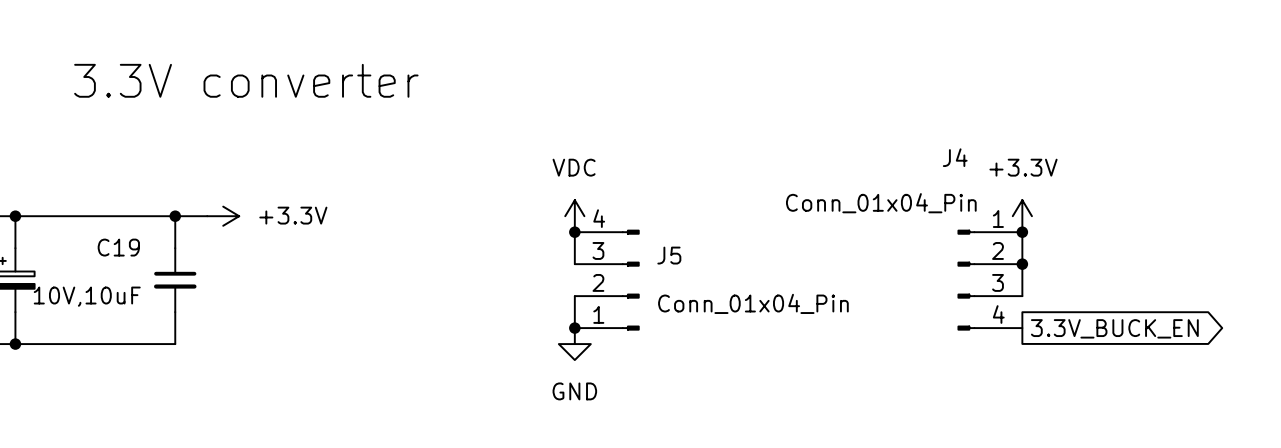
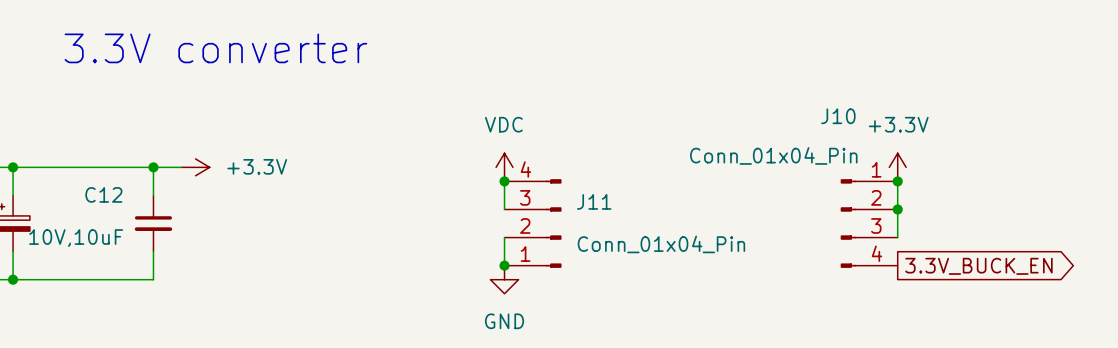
J4 name: J4 (955, 157) -> J10 (838, 116)
C19 name: C19 (118, 247) -> C12 (103, 194)
J5 name: J5 (669, 255) -> J11 (594, 201)

